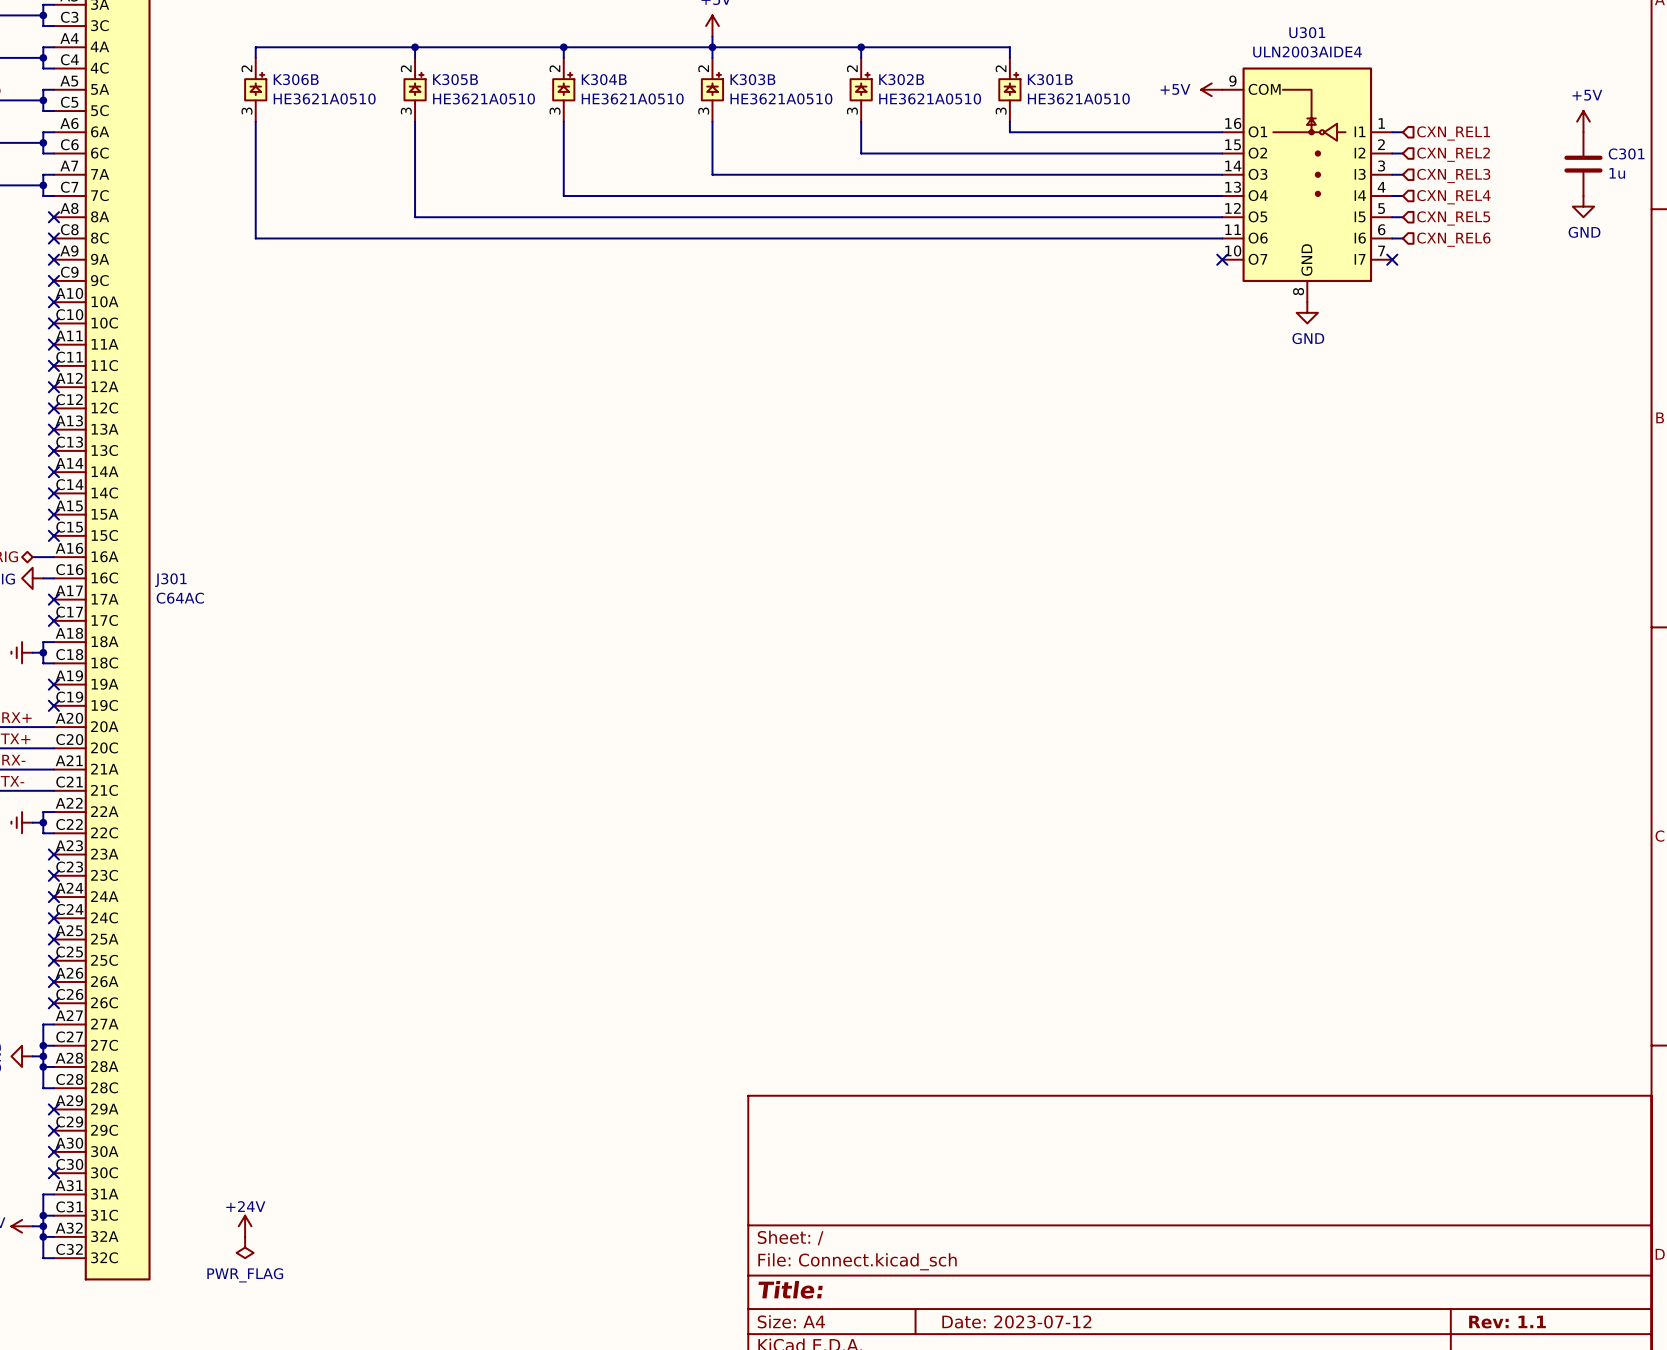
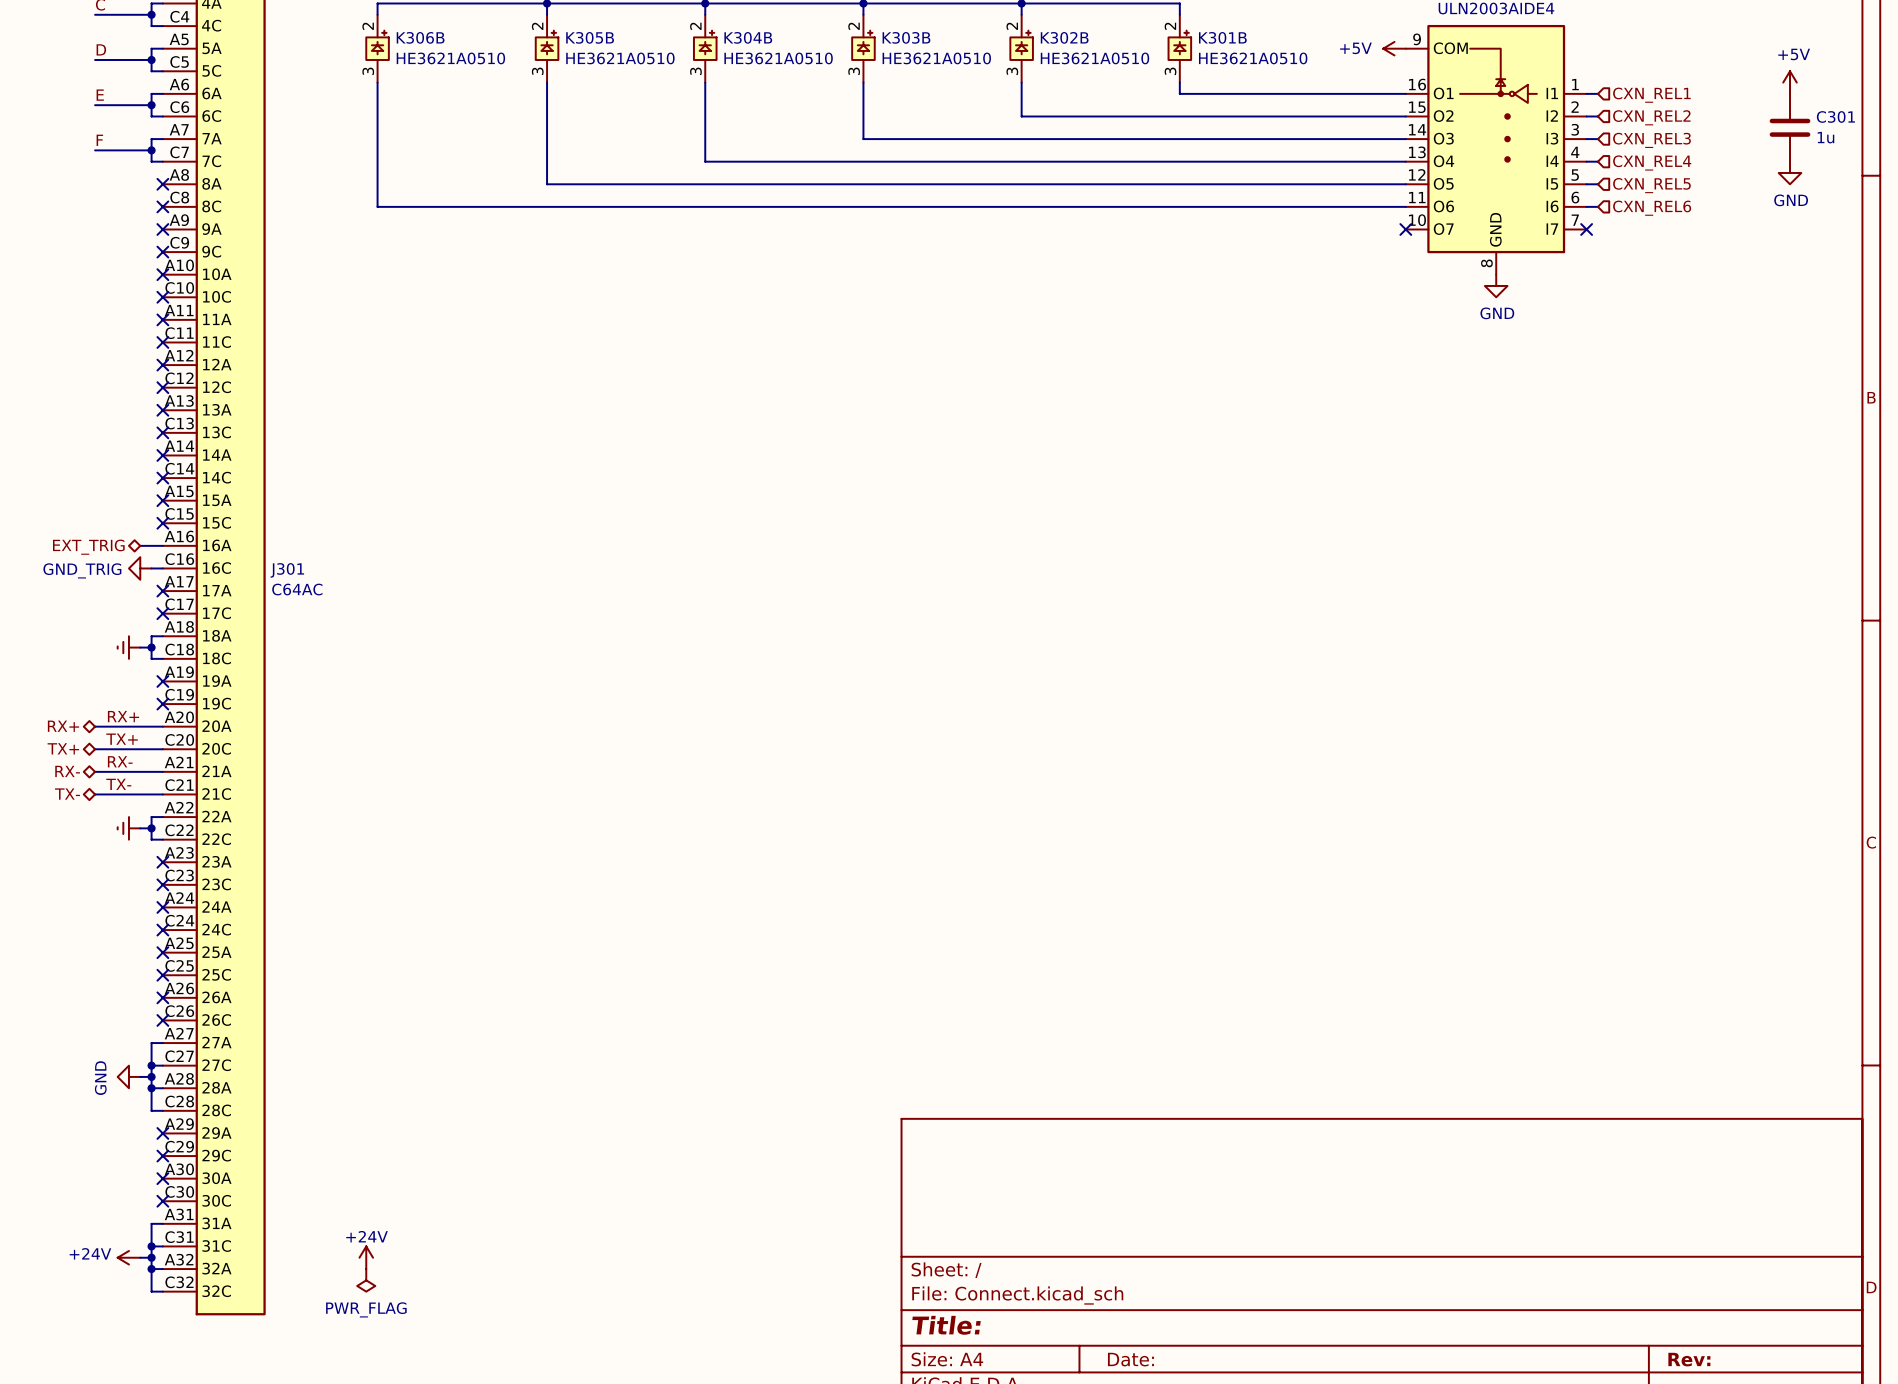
title block: Date: 2023-07-12 (1016, 1321) -> Date: (1130, 1359)
title block: Rev: 1.1 (1507, 1322) -> Rev: (1689, 1359)

